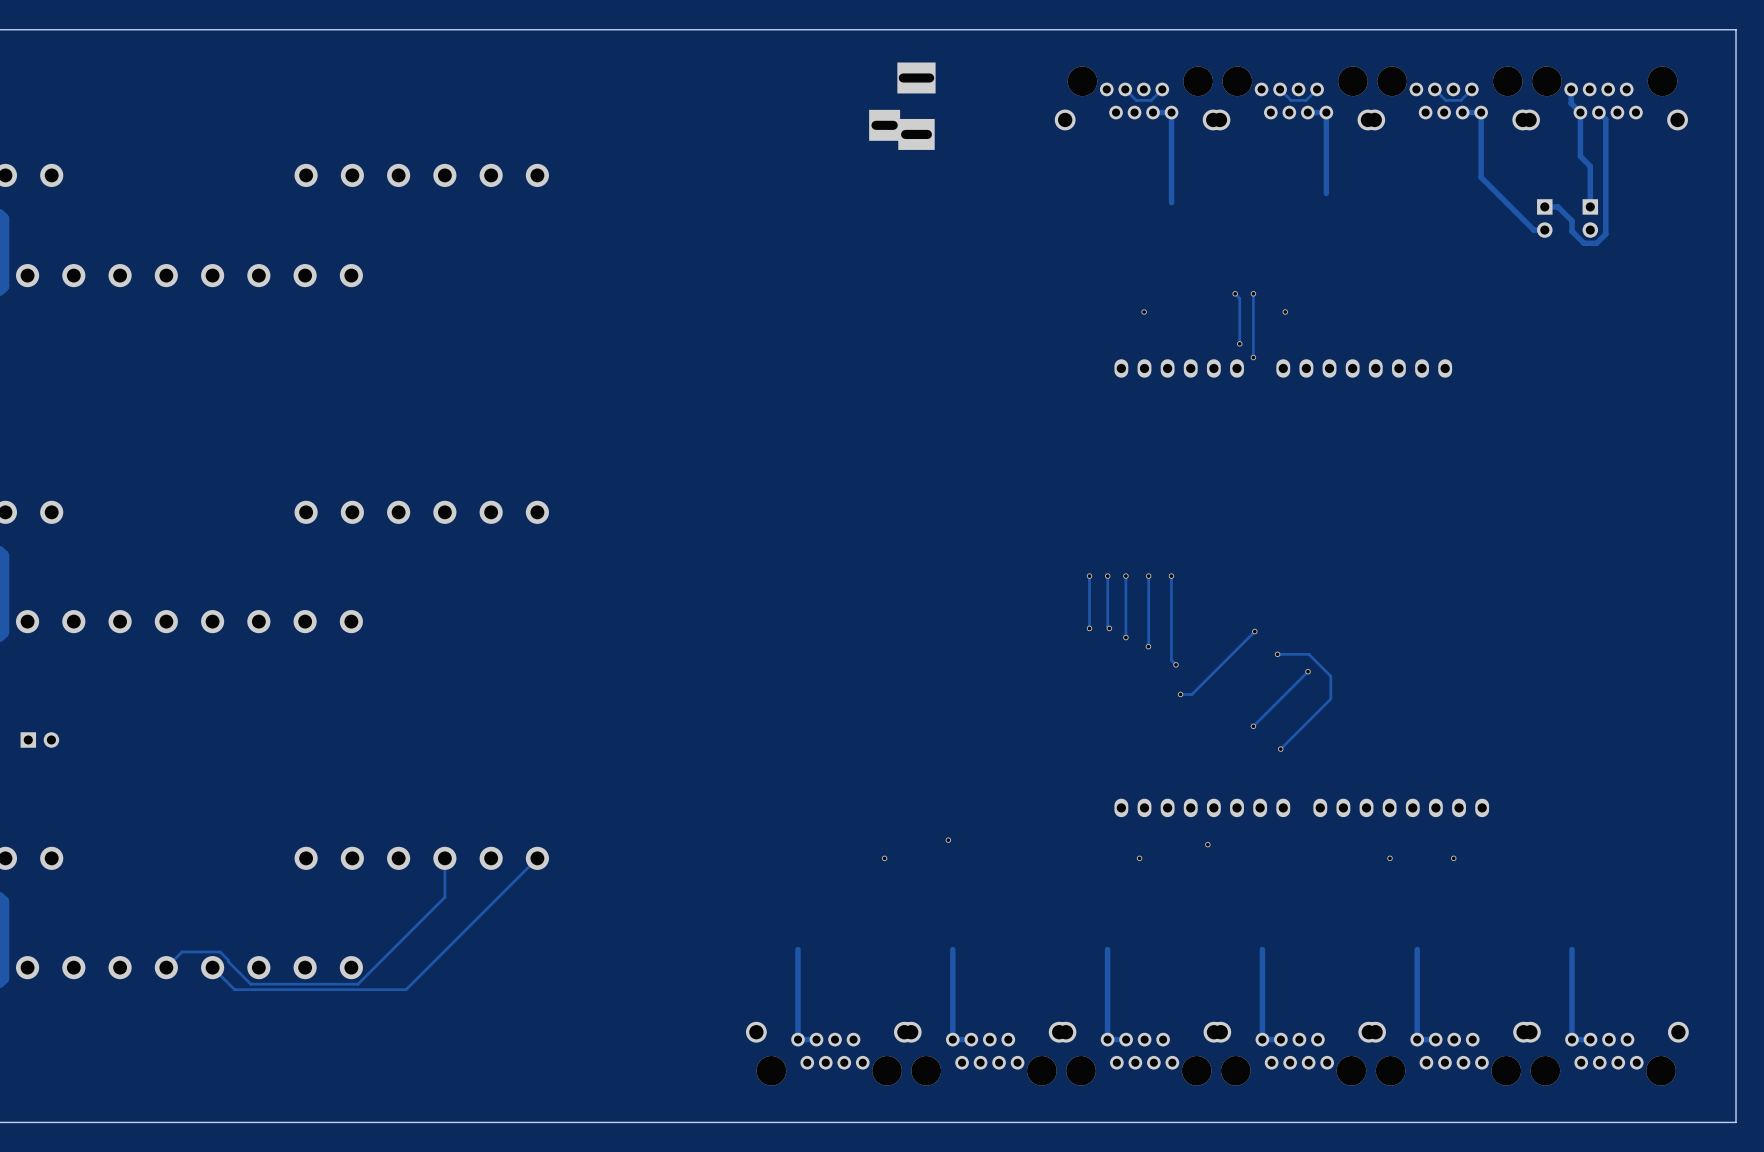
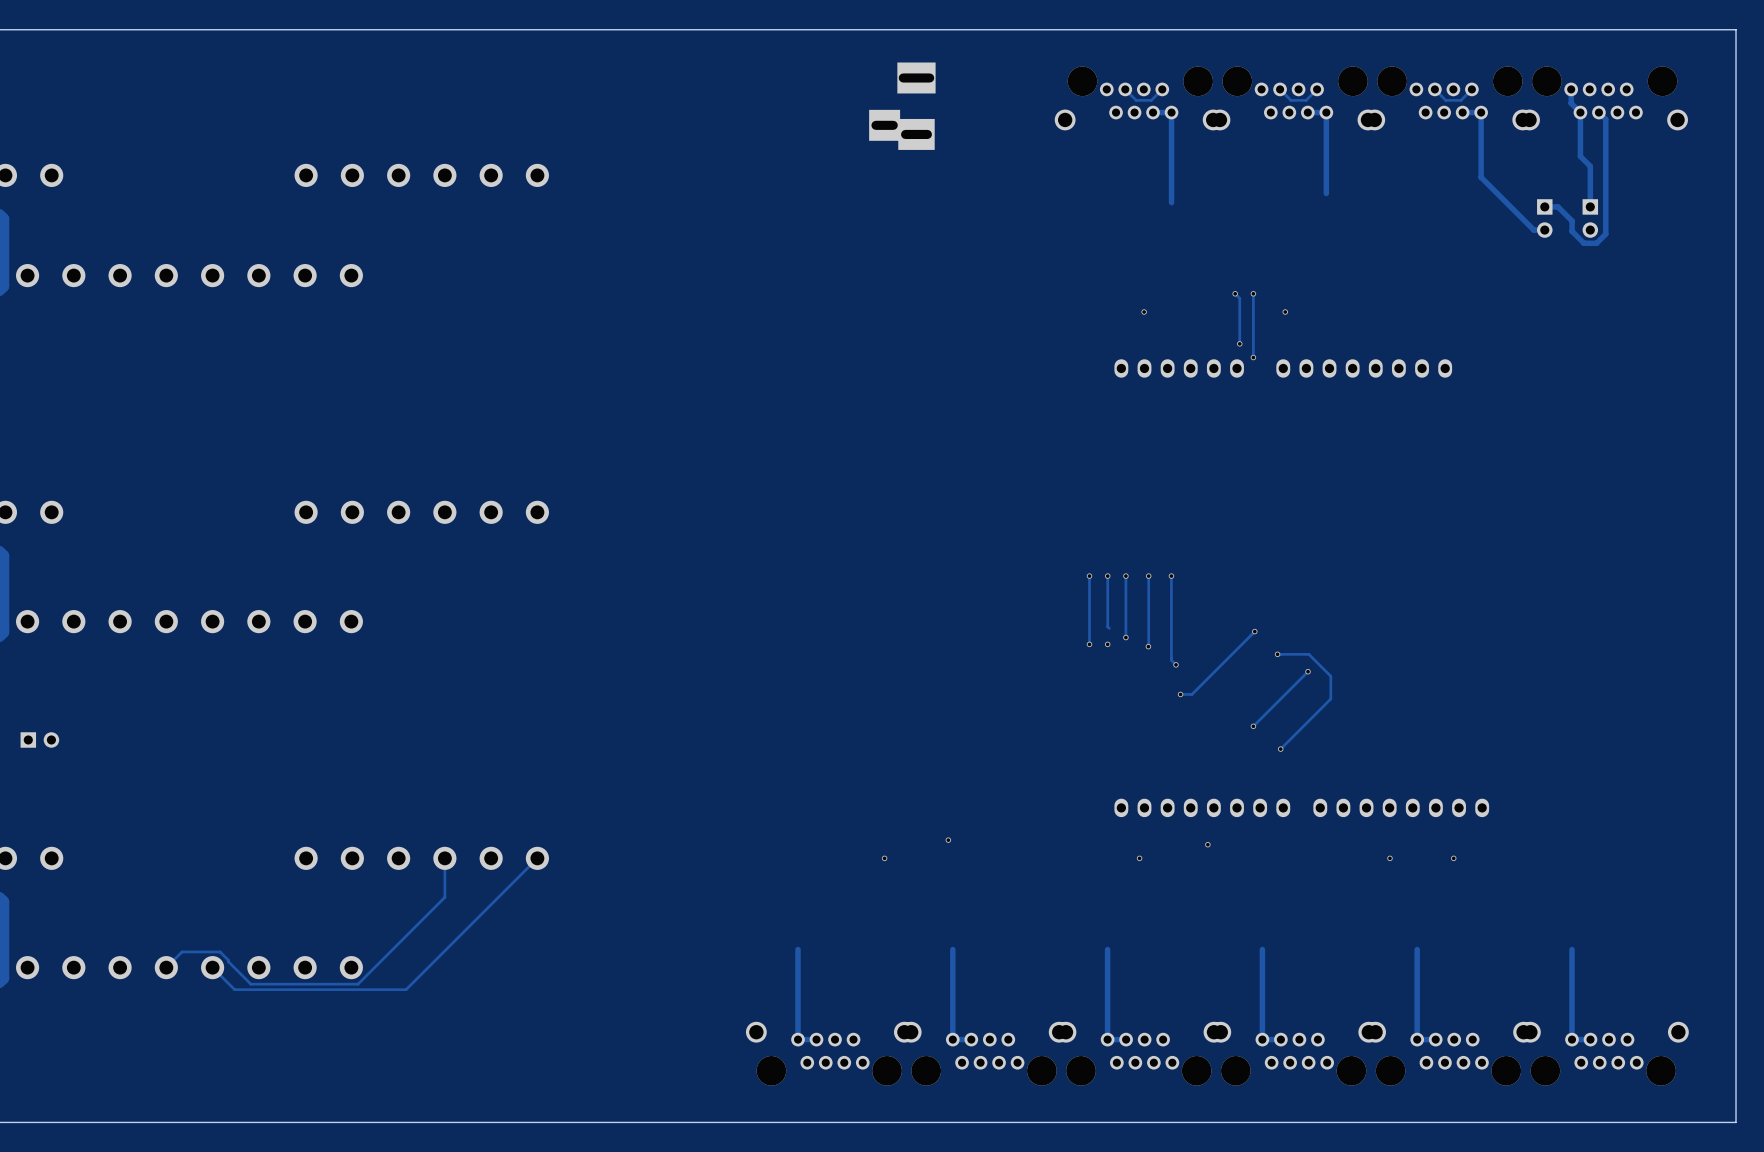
track: none -> (1089, 628) (1089, 644)
via: (1089, 628) -> none
via: (1109, 628) -> none
via: none -> (1089, 644)
via: none -> (1107, 644)

